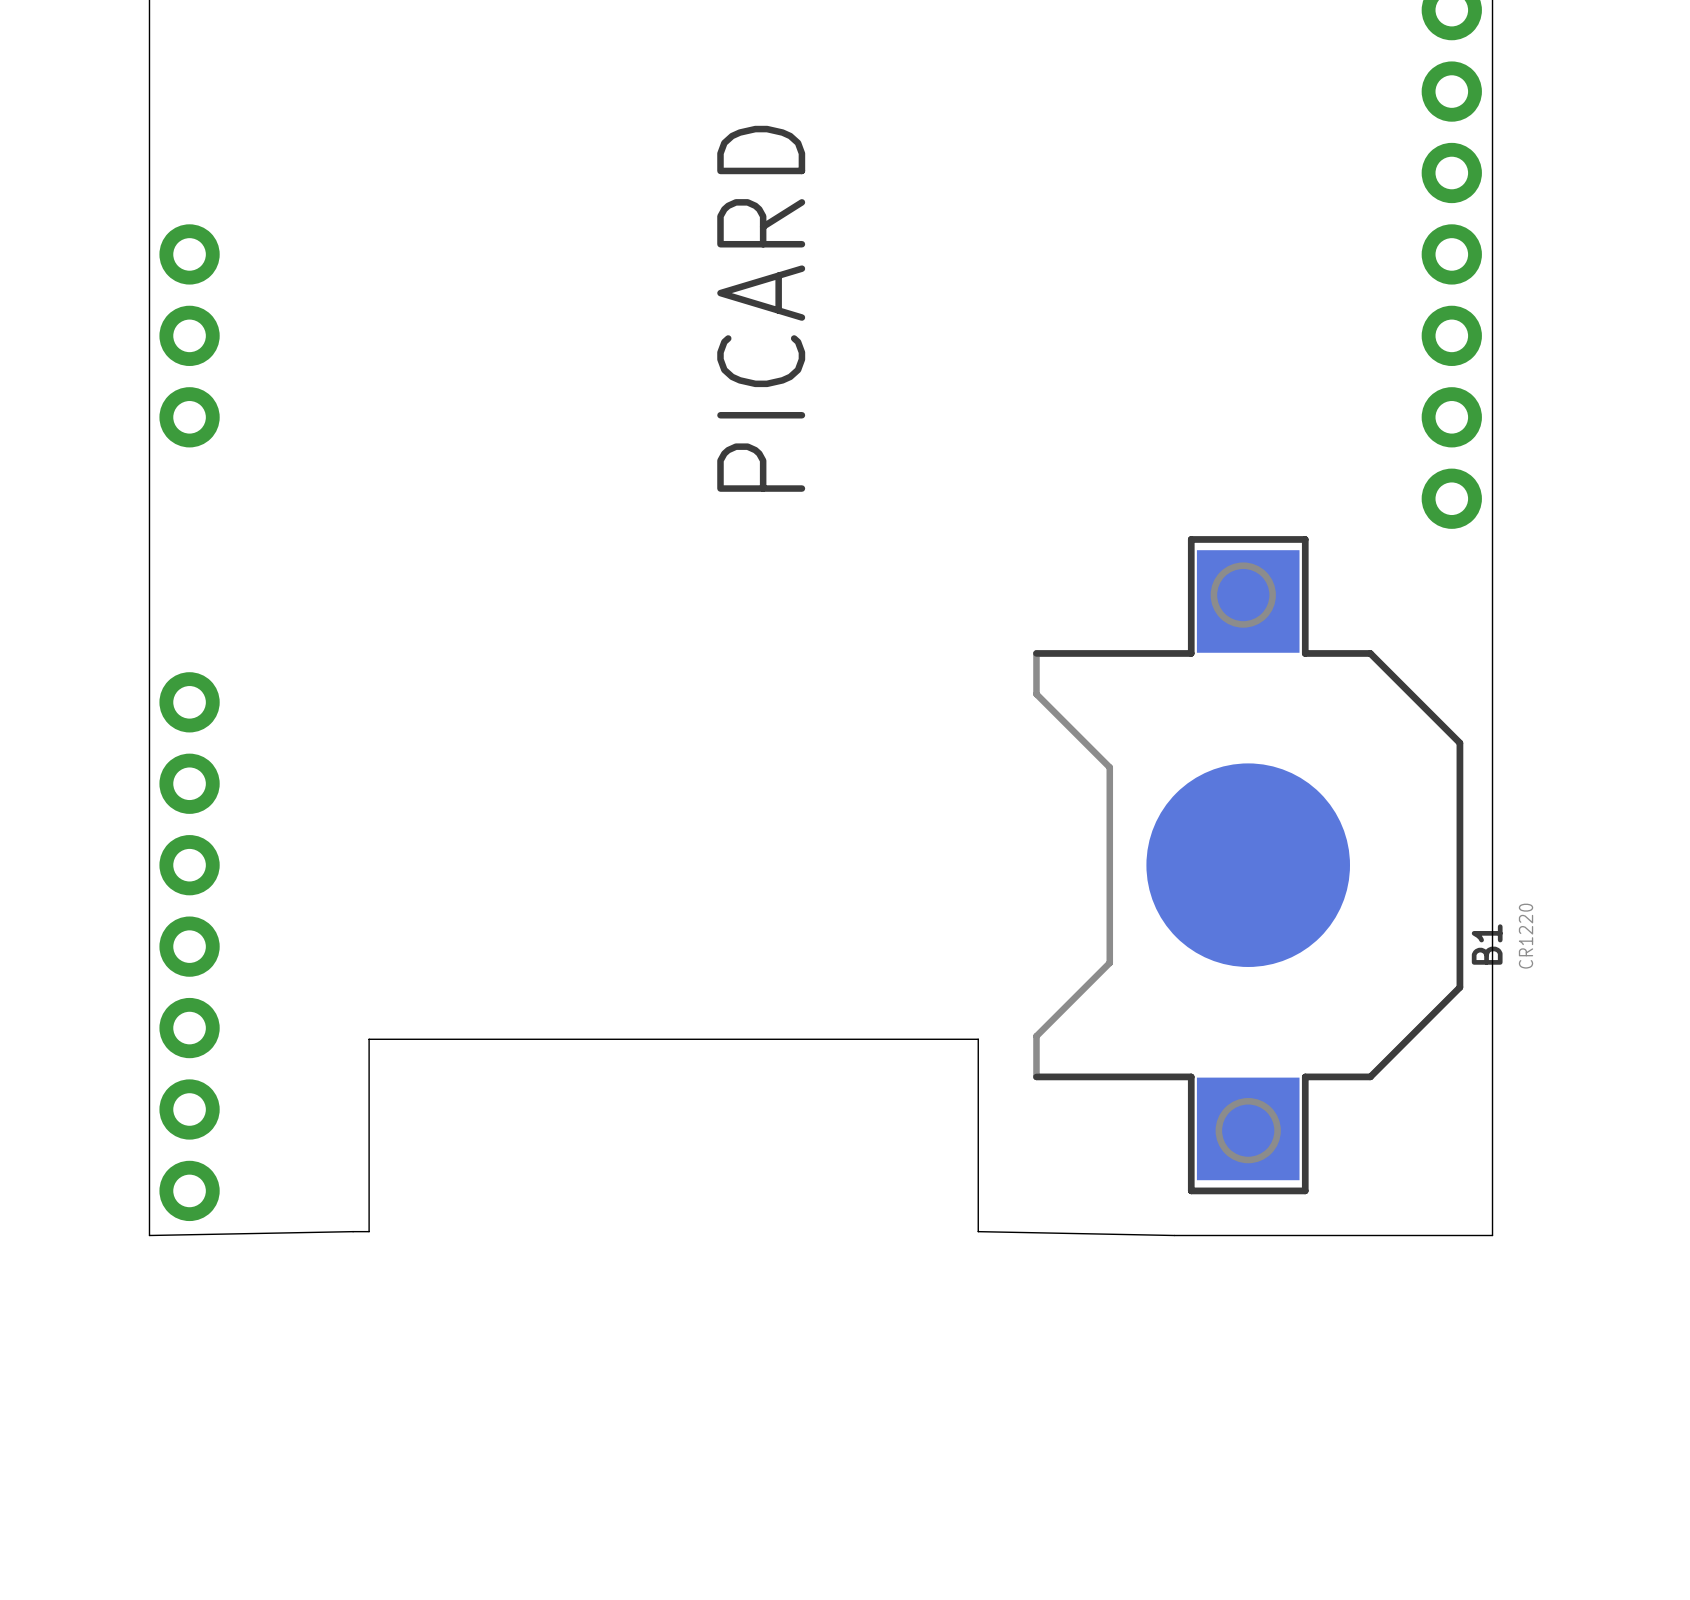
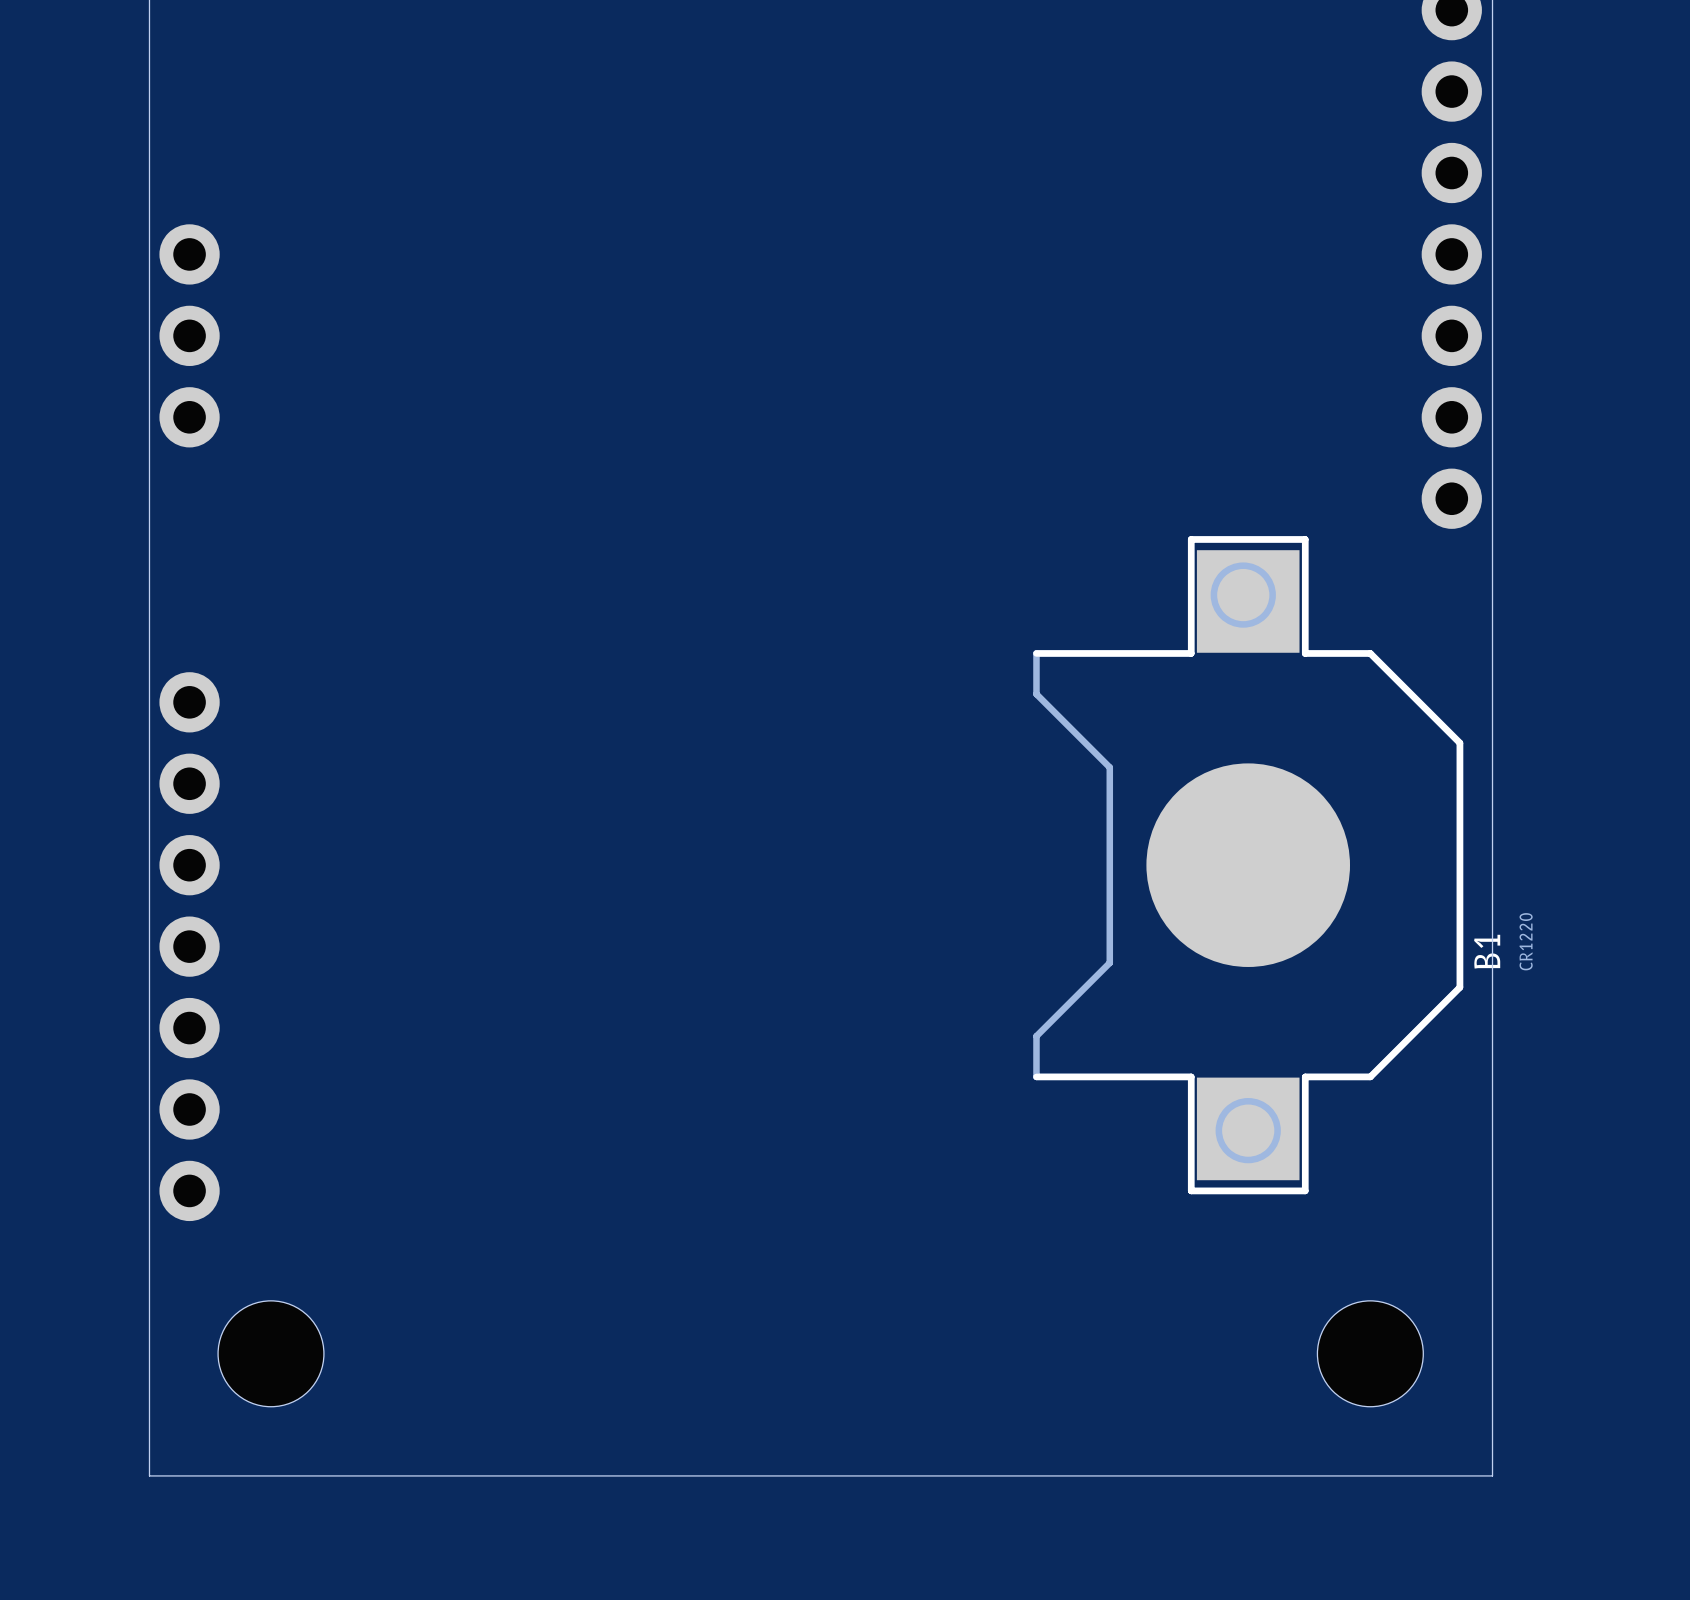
text: PICARD (761, 308) -> none
board edge: (1492, 1235) (1174, 1235) (978, 1231) (978, 1039) (369, 1039) (369, 1231) (149, 1235) -> (1492, 1235) (1492, 1475) (149, 1475) (149, 1235)
part: none -> (271, 1353)
part: none -> (1370, 1353)

